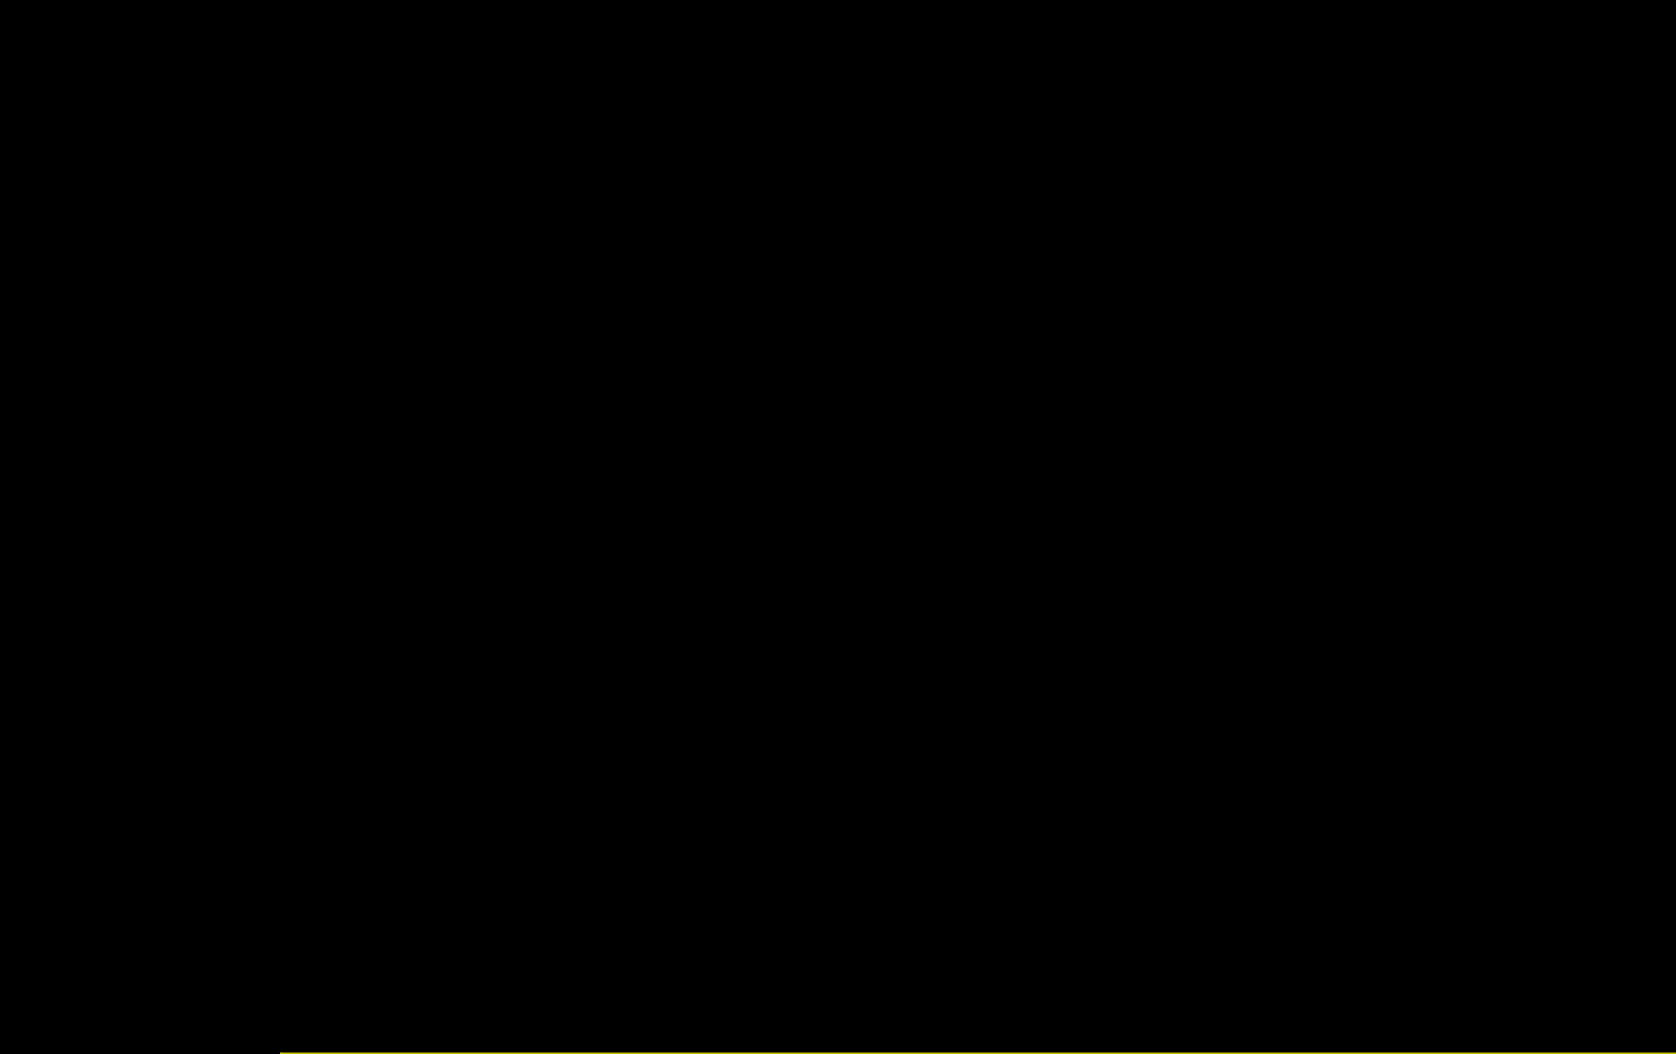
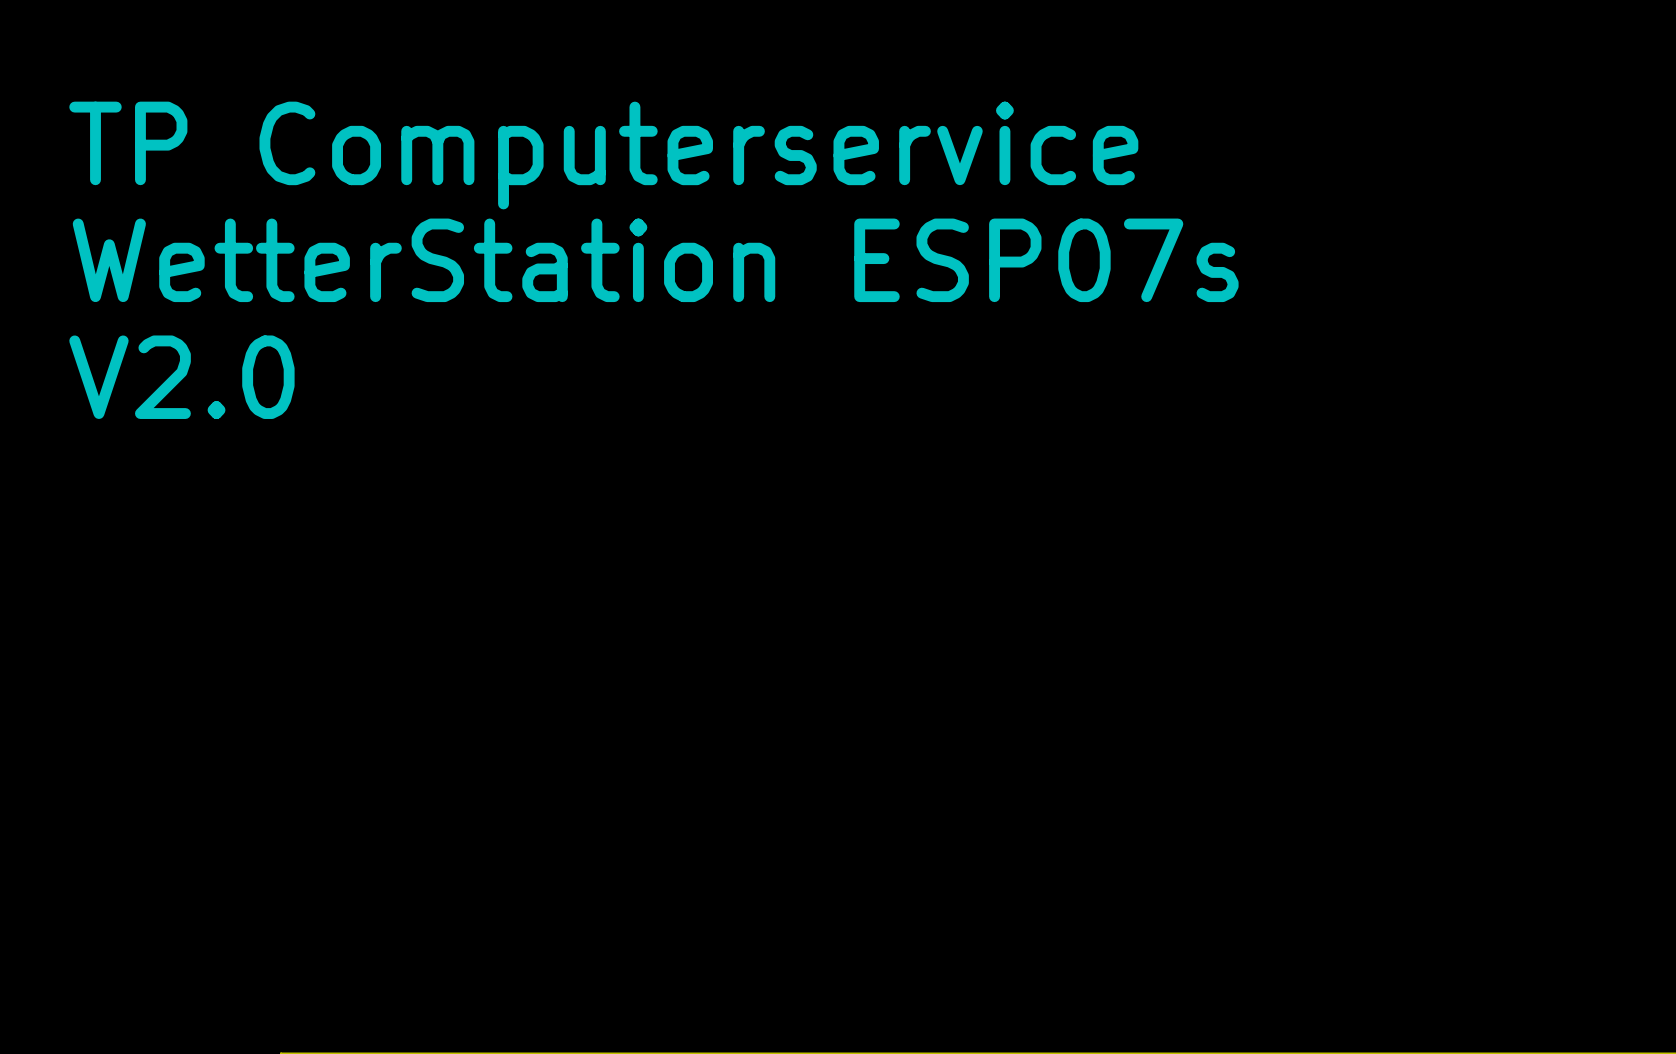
text: none -> TP Computerservice (603, 155)
text: none -> WetterStation ESP07s (655, 260)
text: none -> V2.0 (181, 377)

